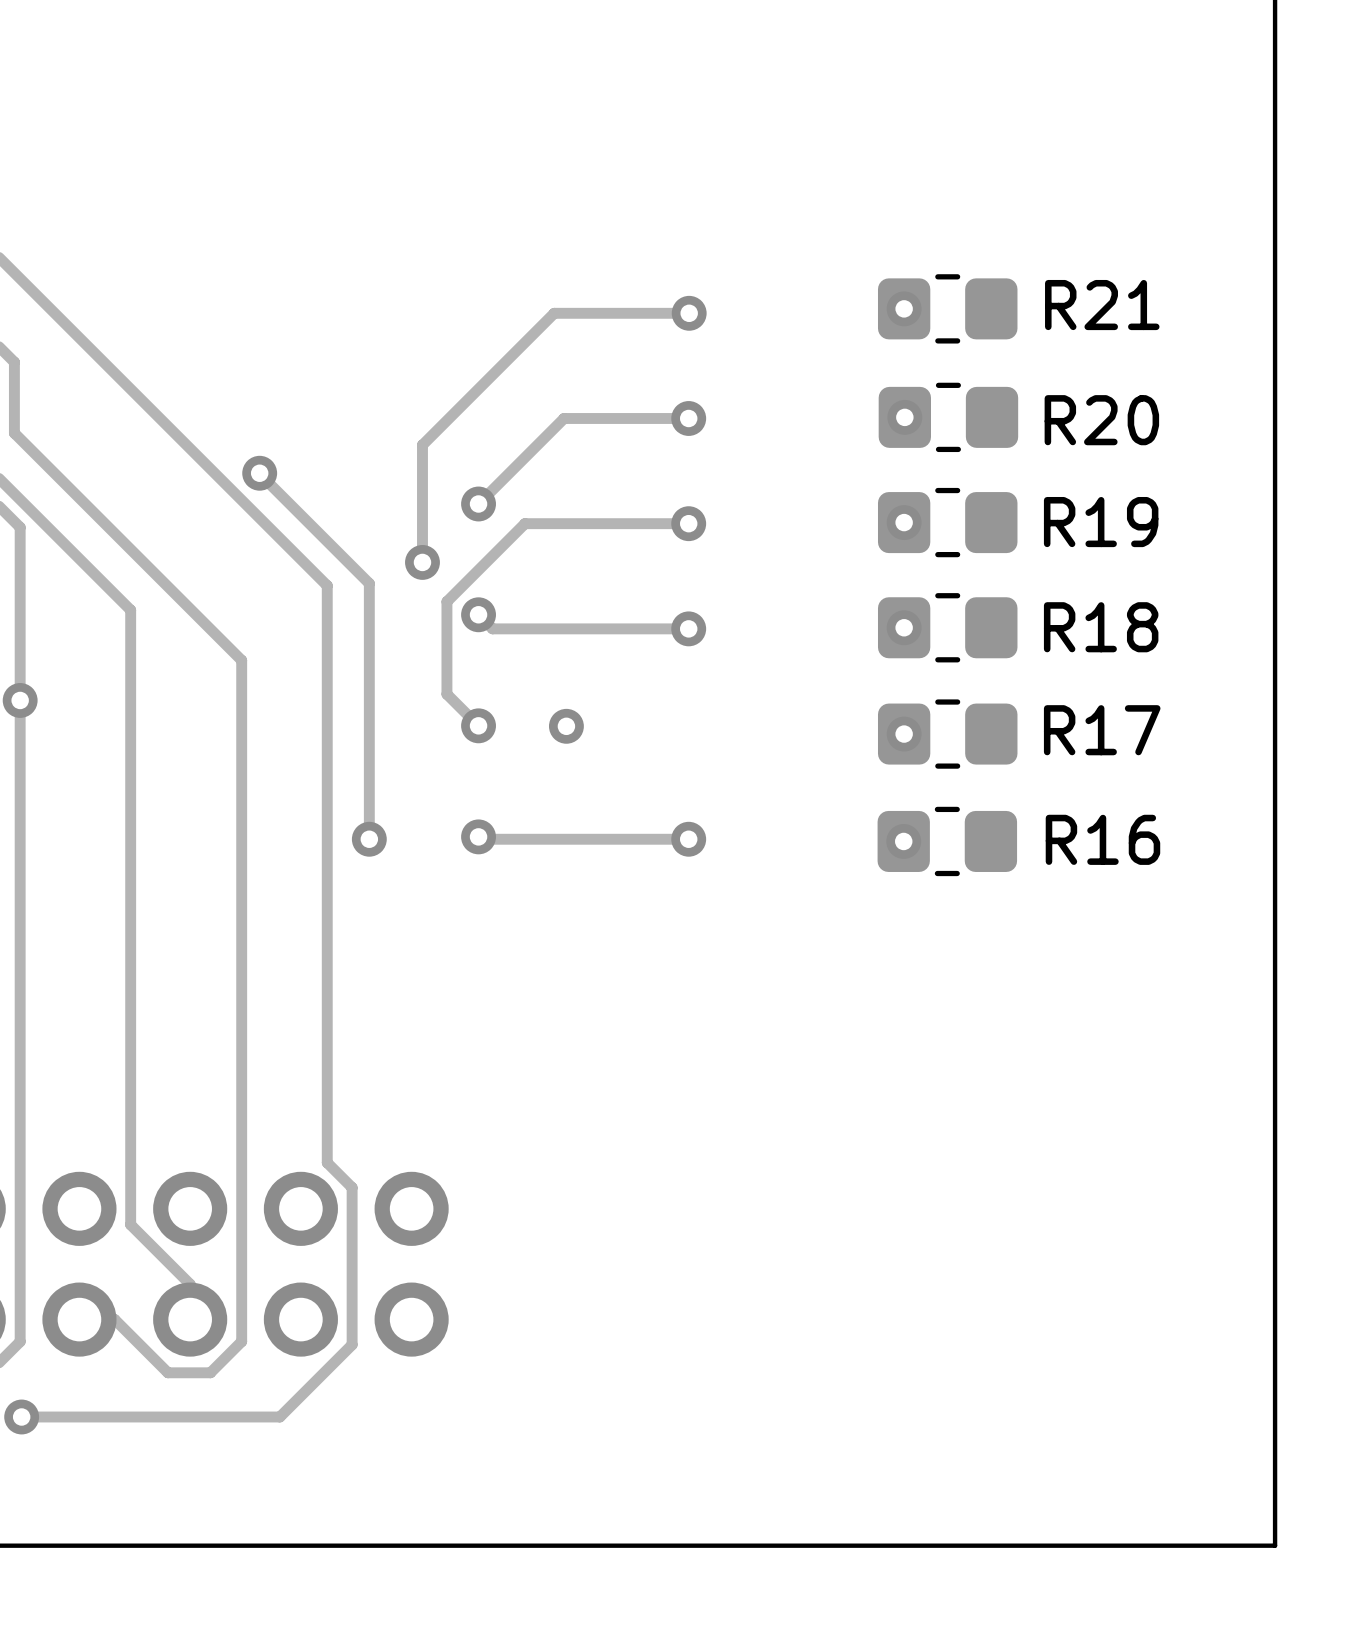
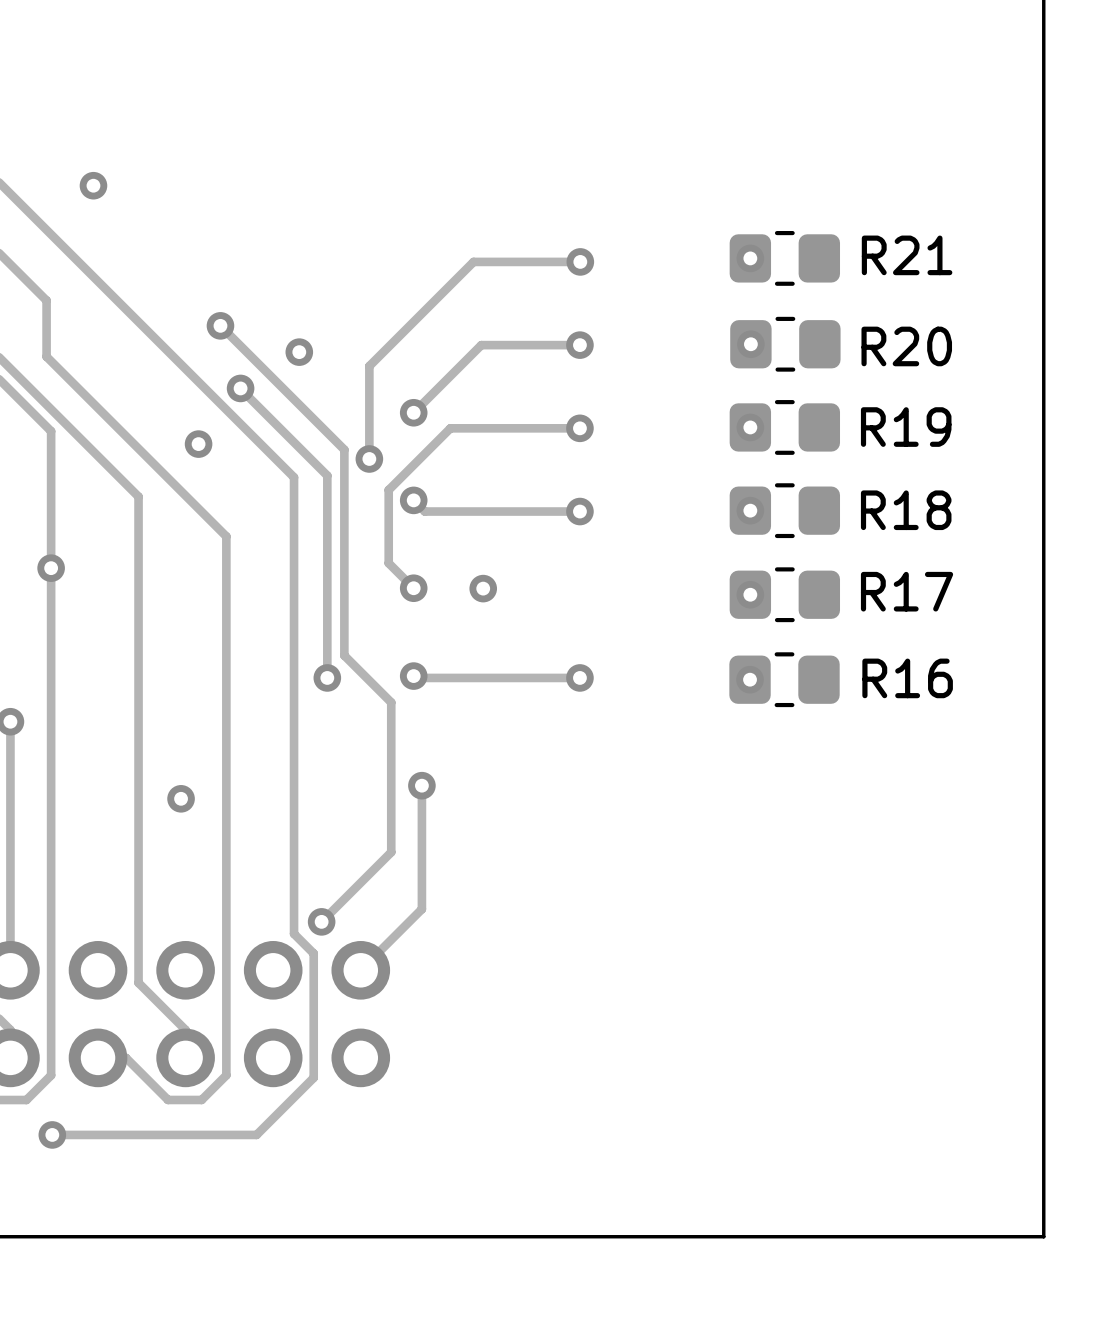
via: none -> (93, 185)
track: none -> (220, 325) (344, 449) (344, 655) (391, 702) (391, 852) (321, 921)
via: none -> (220, 325)
via: none -> (299, 352)
via: none -> (198, 444)
track: none -> (421, 785) (421, 909) (360, 970)
via: none -> (421, 785)
via: none -> (181, 798)
via: none -> (321, 921)

